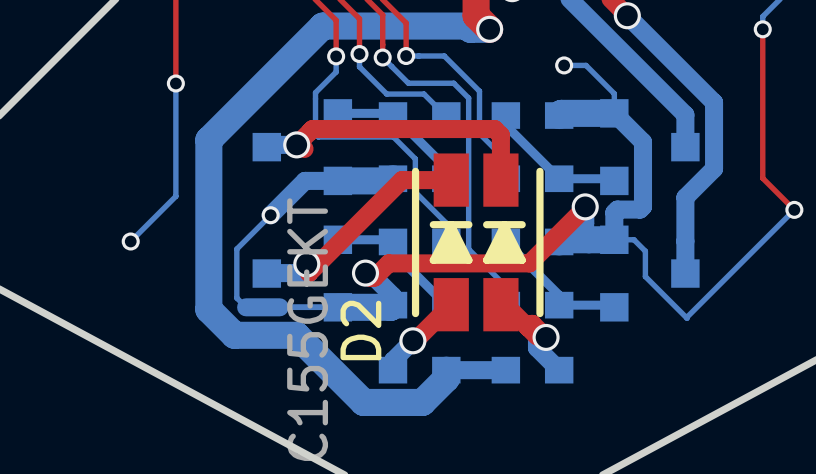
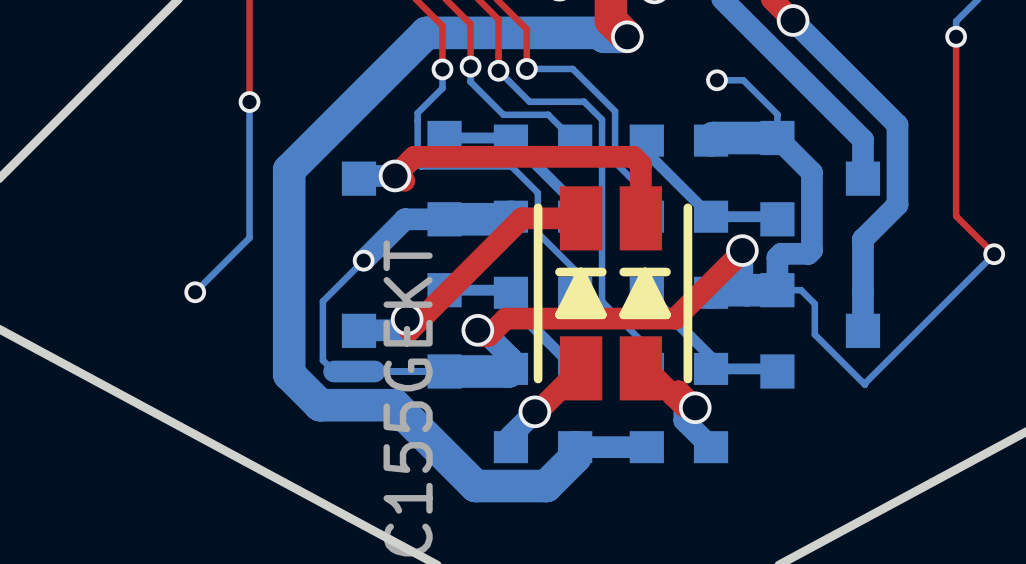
D2 name: D2 (360, 330) -> none

